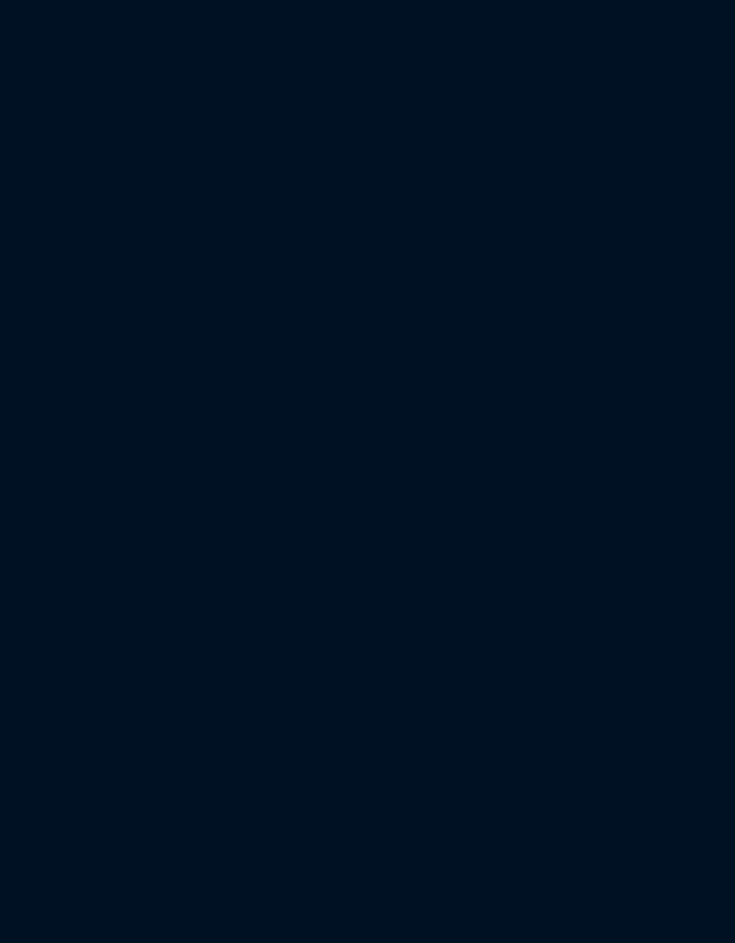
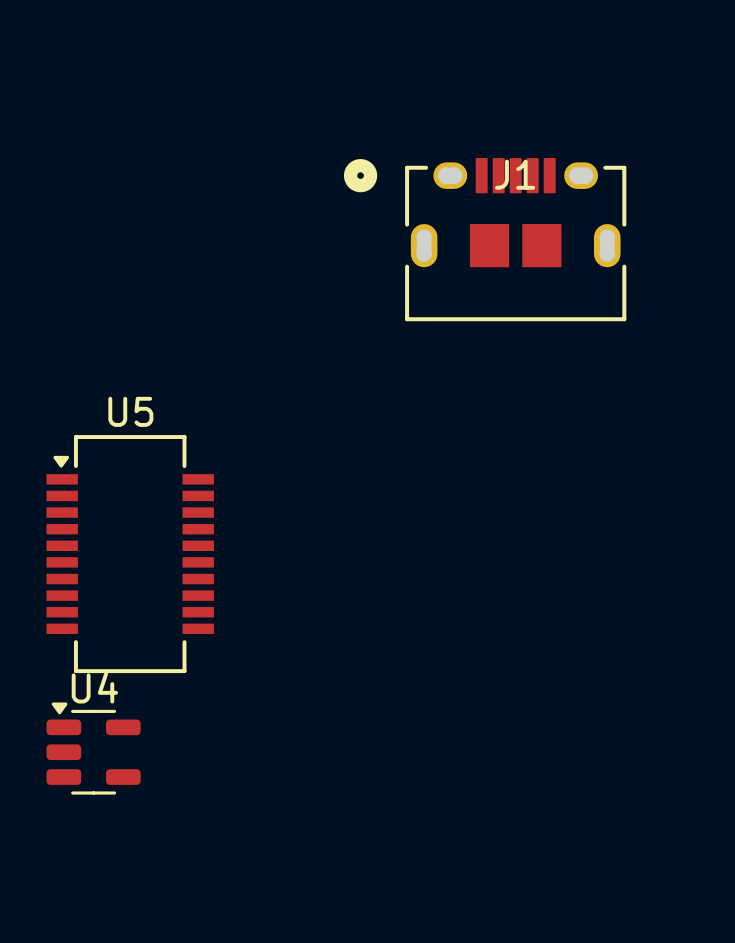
J1: none -> (485, 239)
U5: none -> (130, 554)
U4: none -> (93, 748)

